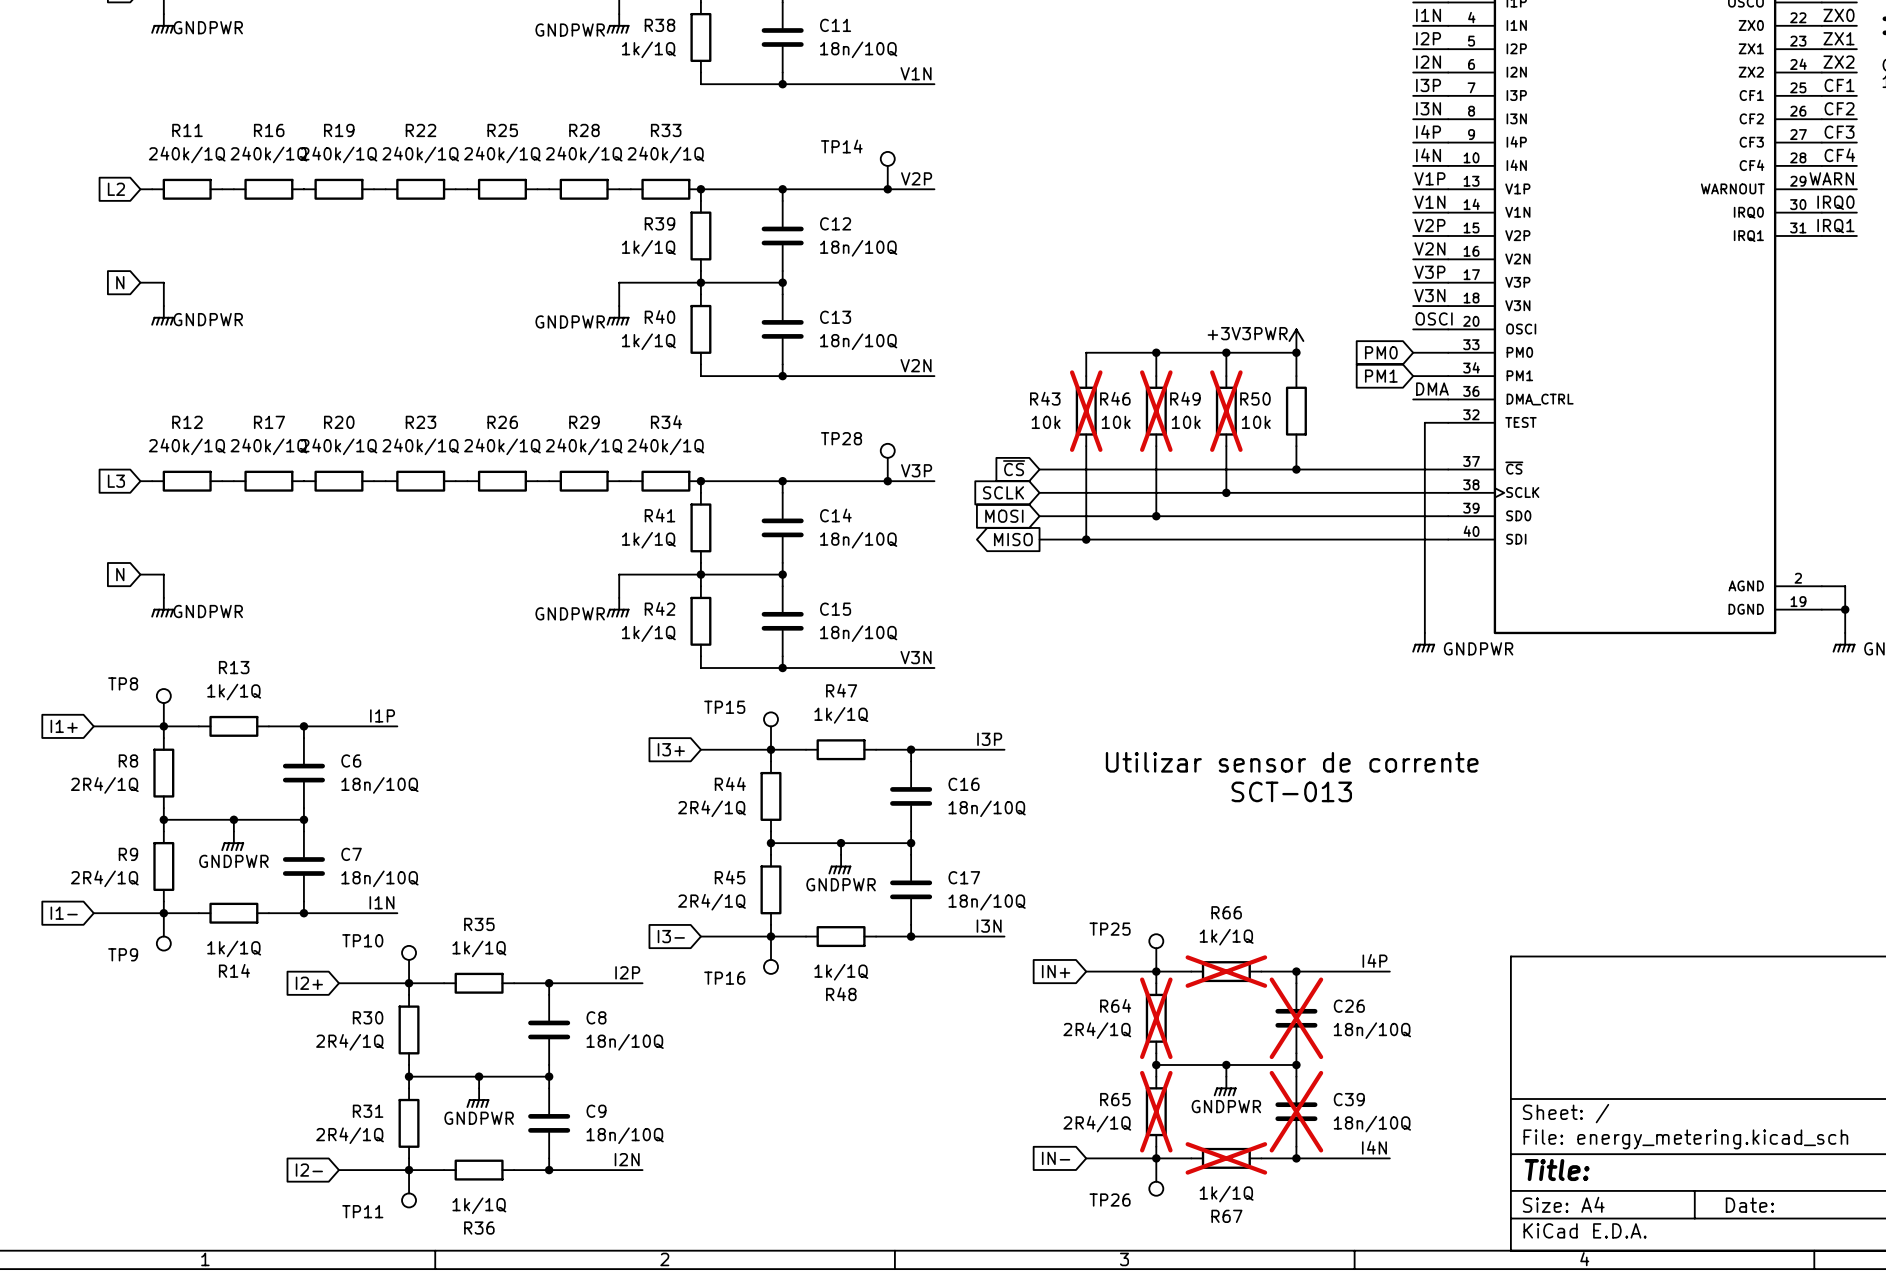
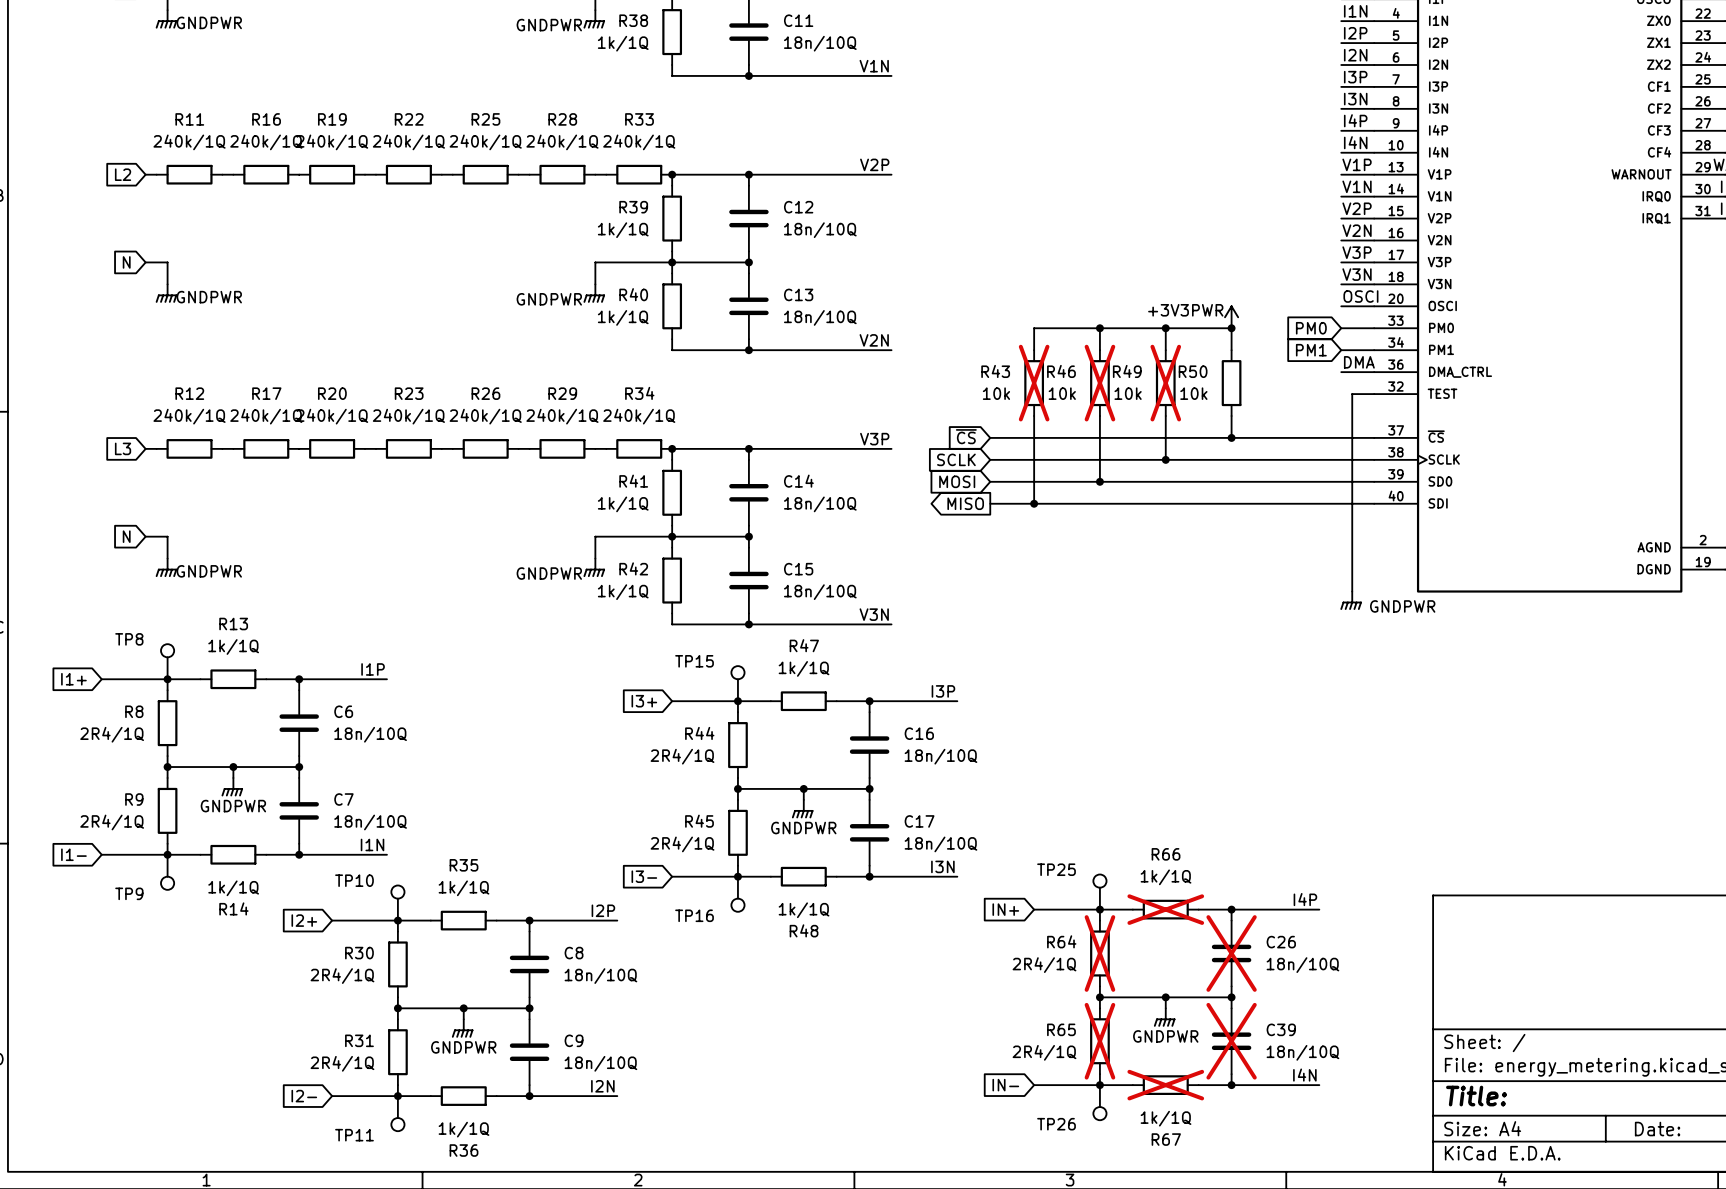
TP14: (887, 170) -> none
junction: (887, 189) -> none
TP28: (887, 462) -> none
junction: (887, 481) -> none
text: Utilizar sensor de corrente (1292, 762) -> none
text: SCT-013 (1291, 791) -> none

